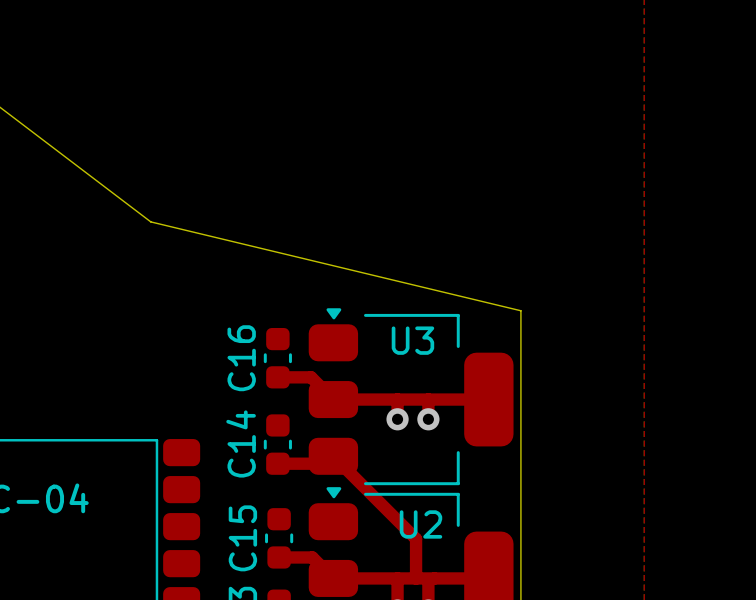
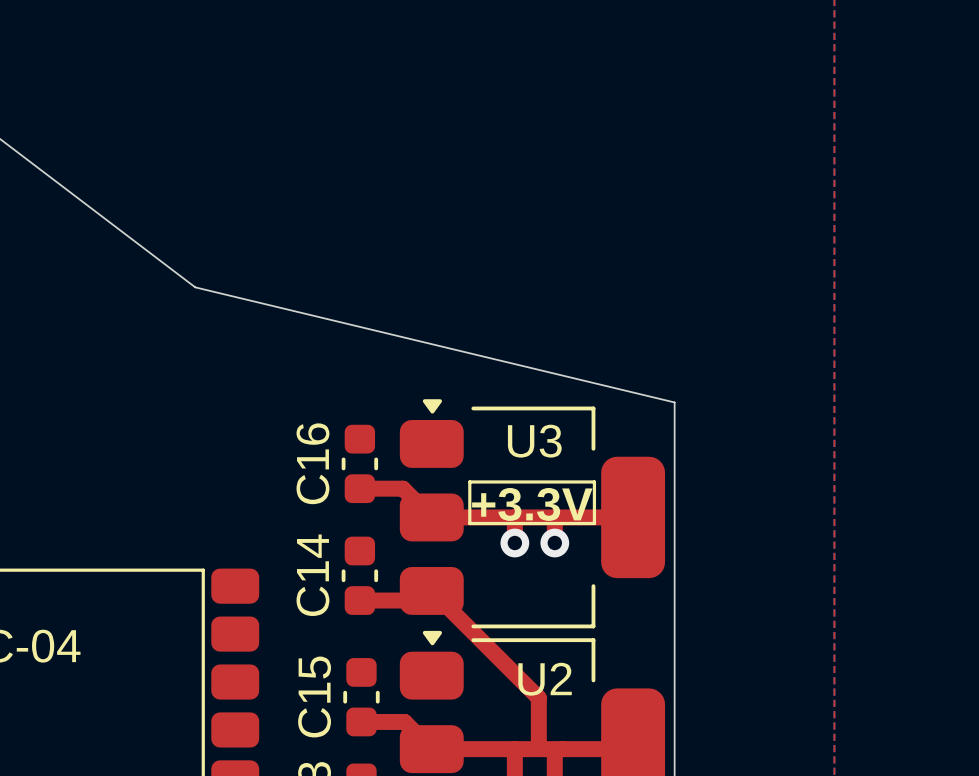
line: none -> (469, 481) (594, 481) (594, 523) (469, 523) (469, 481)
text: none -> +3.3V (532, 504)

